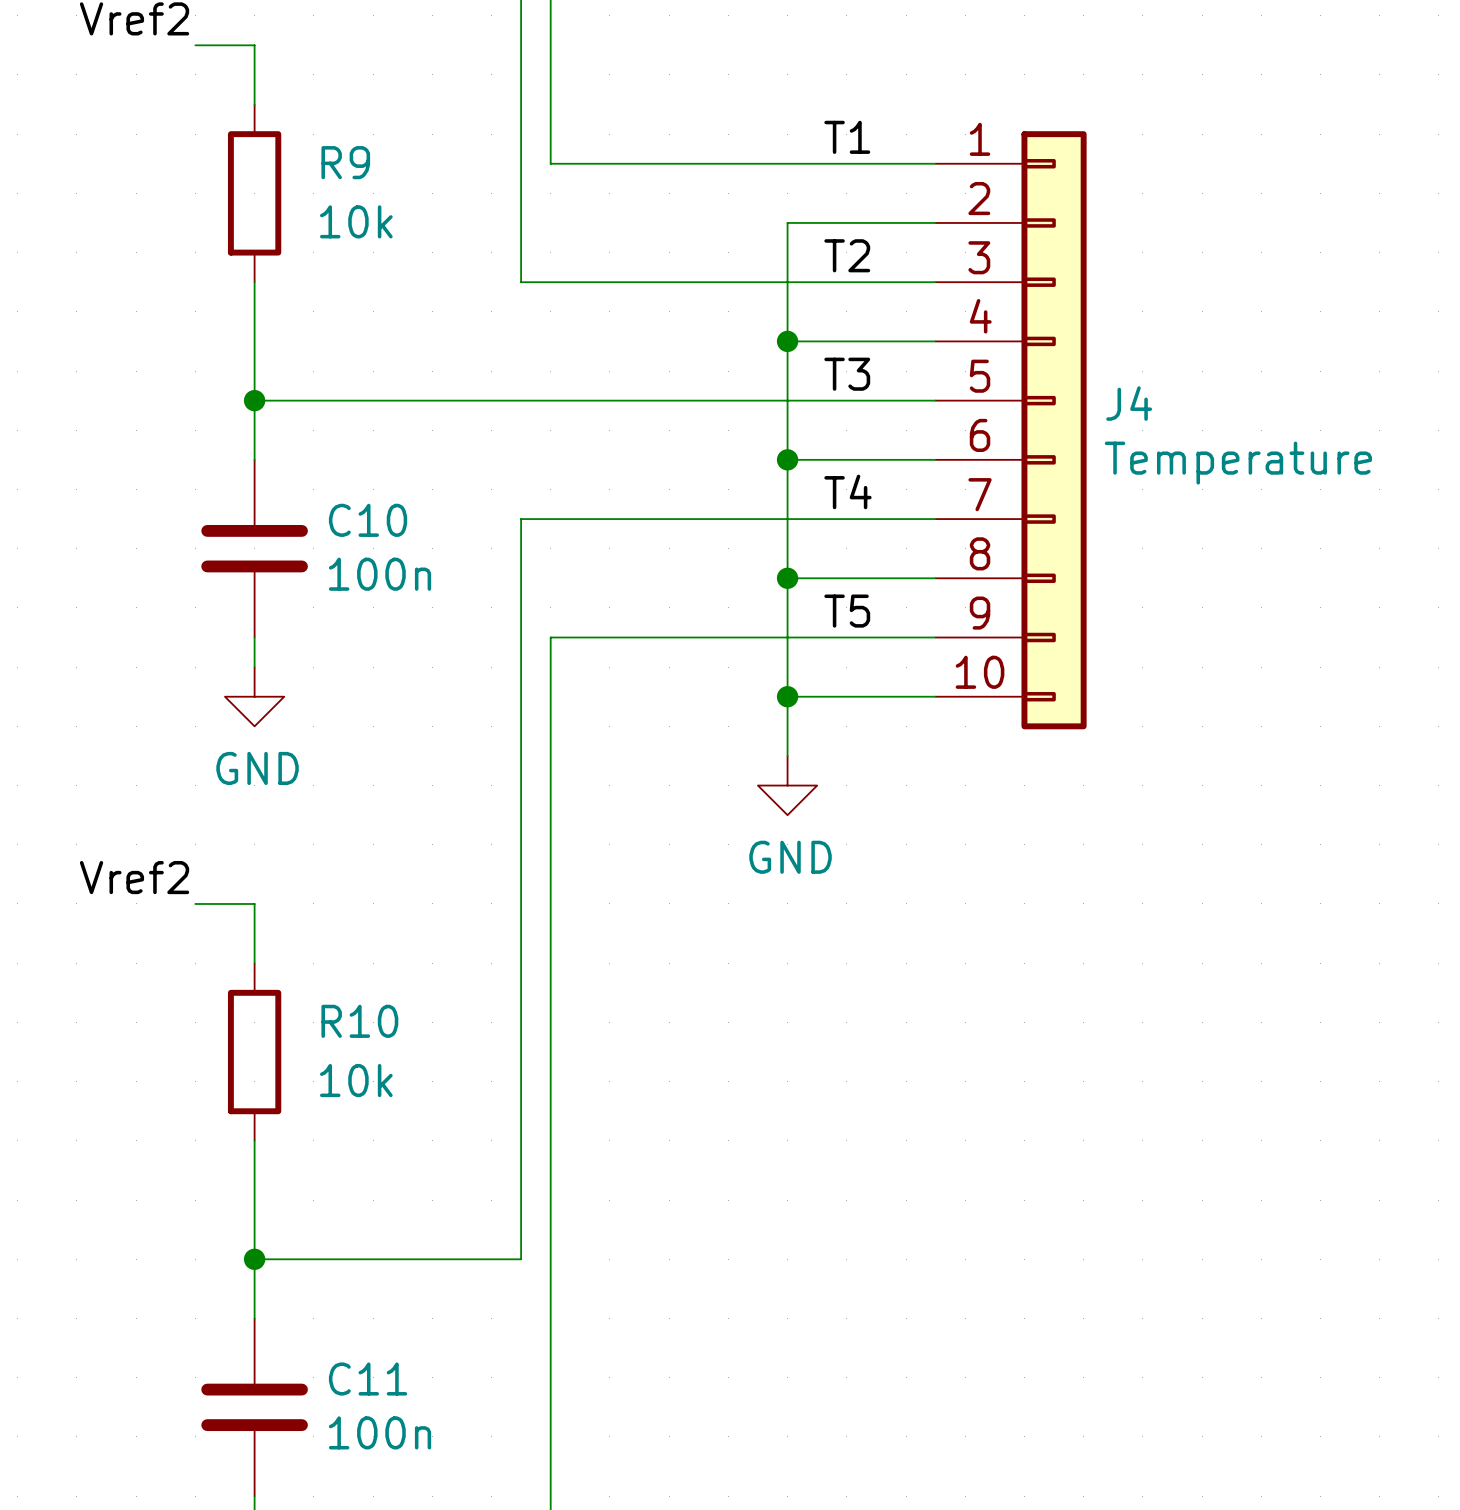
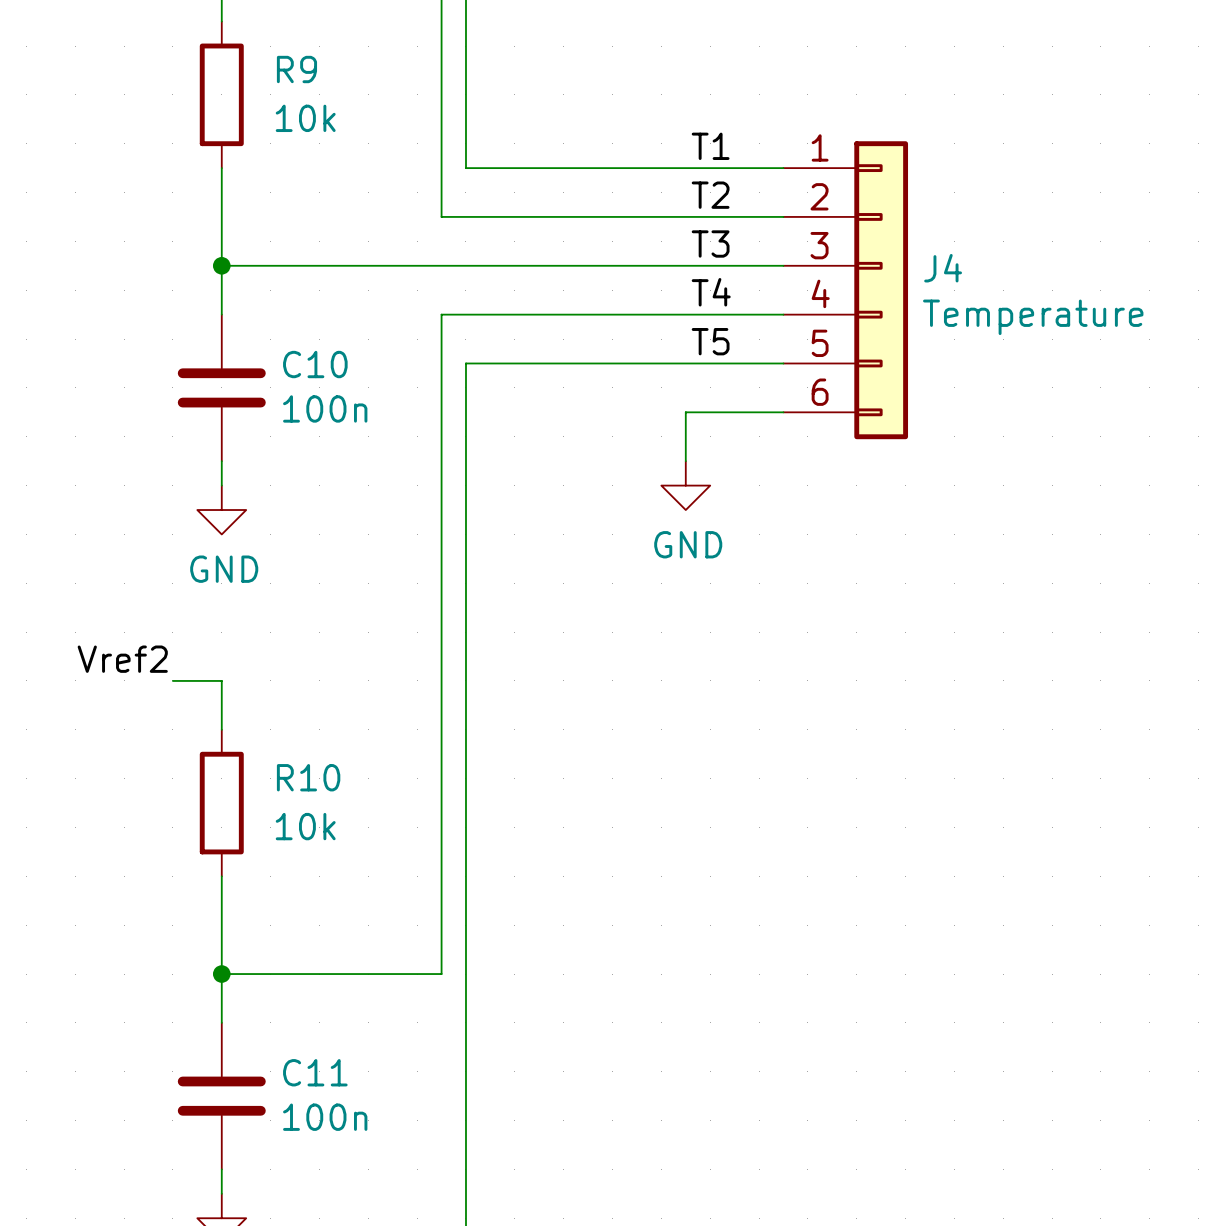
J4 symbol: [935, 131, 1087, 730] -> [783, 141, 909, 440]
label: T1 (847, 137) -> none
wire: (550, 163) (935, 163) -> none
wire: (935, 222) (787, 222) (787, 755) -> none
label: T2 (847, 255) -> T1 (710, 146)
wire: (521, 282) (550, 282) -> (465, 70) (465, 168)
wire: none -> (441, 168) (441, 216) (661, 216)
label: none -> T2 (710, 195)
junction: (787, 341) -> none
label: none -> T4 (711, 292)
wire: none -> (661, 314) (441, 314) (441, 363)
junction: (787, 459) -> none
label: T4 (847, 491) -> T5 (710, 341)
wire: (521, 519) (550, 519) -> (465, 461) (465, 363)
wire: (787, 578) (817, 578) -> (685, 461) (685, 412)
junction: (787, 578) -> none
label: T5 (847, 611) -> none
wire: (550, 637) (935, 637) -> none
wire: (787, 696) (935, 696) -> none
junction: (787, 696) -> none
power symbol position: GND (787, 785) -> GND (685, 485)

